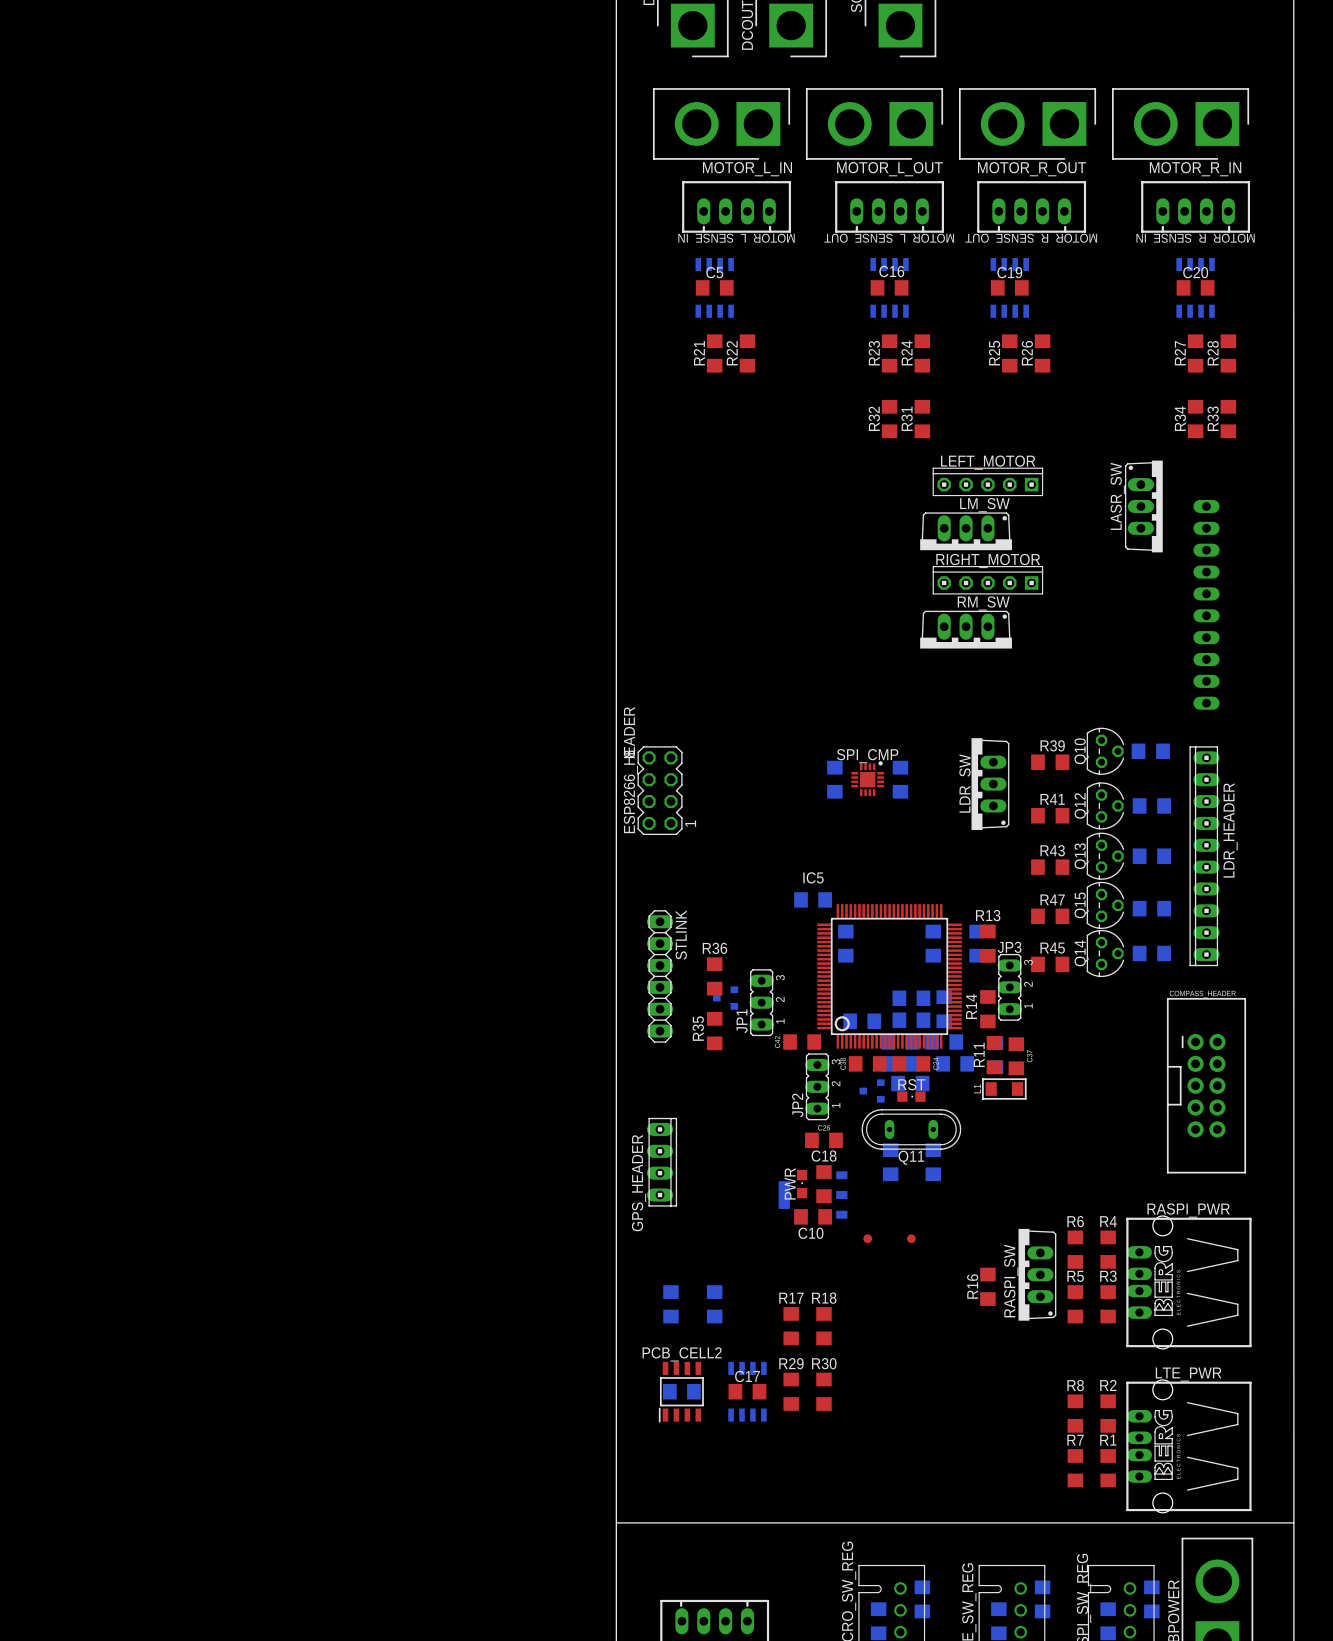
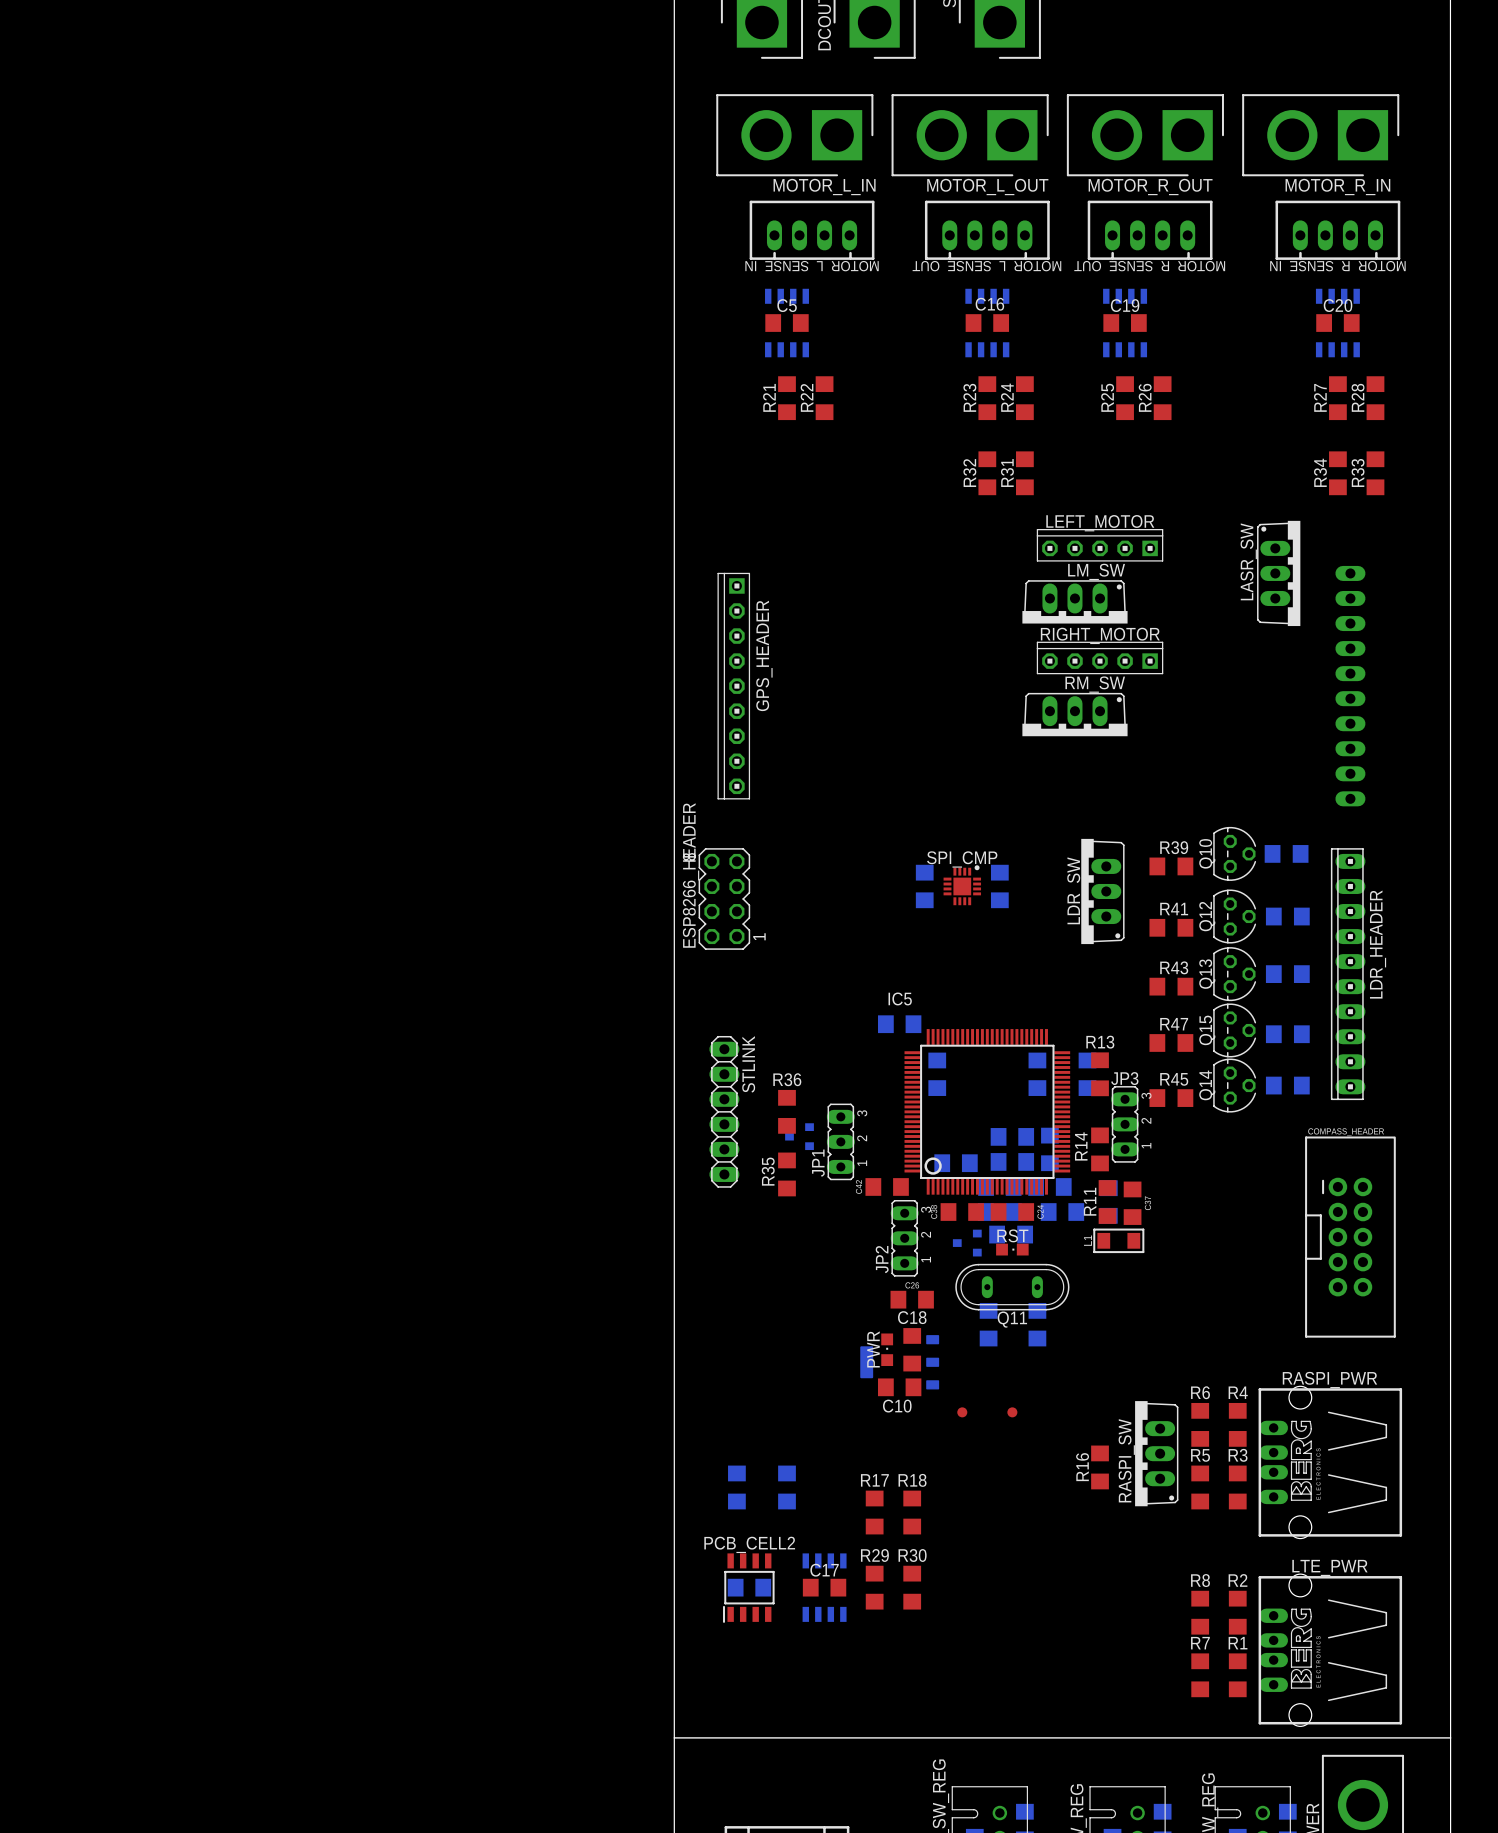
GPS_HEADER: none -> (733, 686)
GPS_HEADER: (662, 1162) -> none

